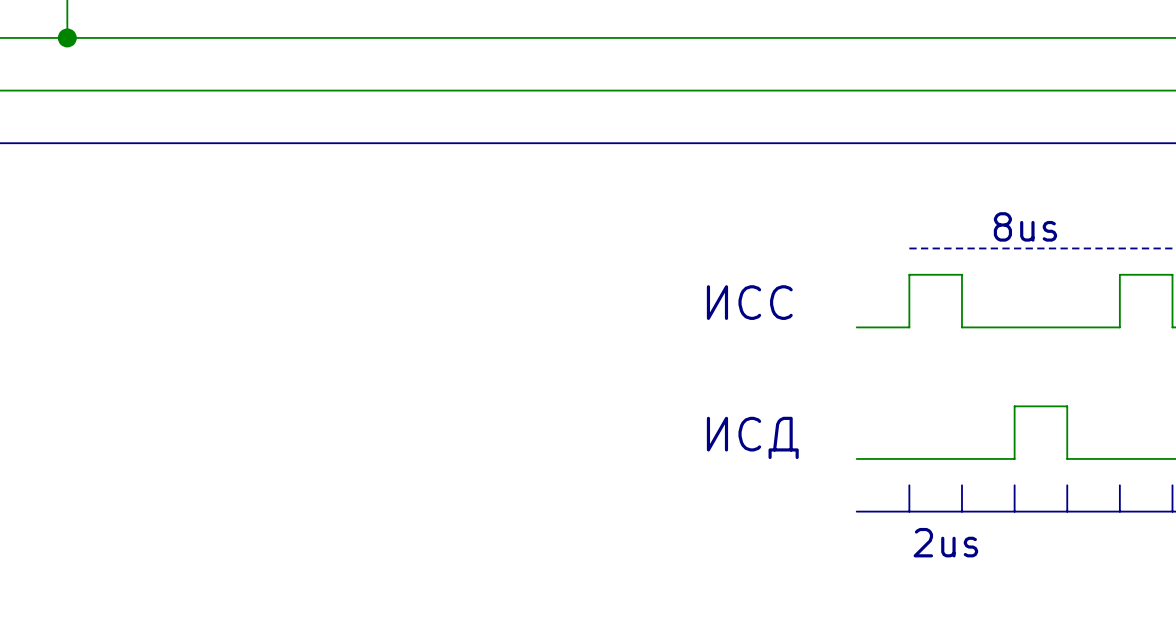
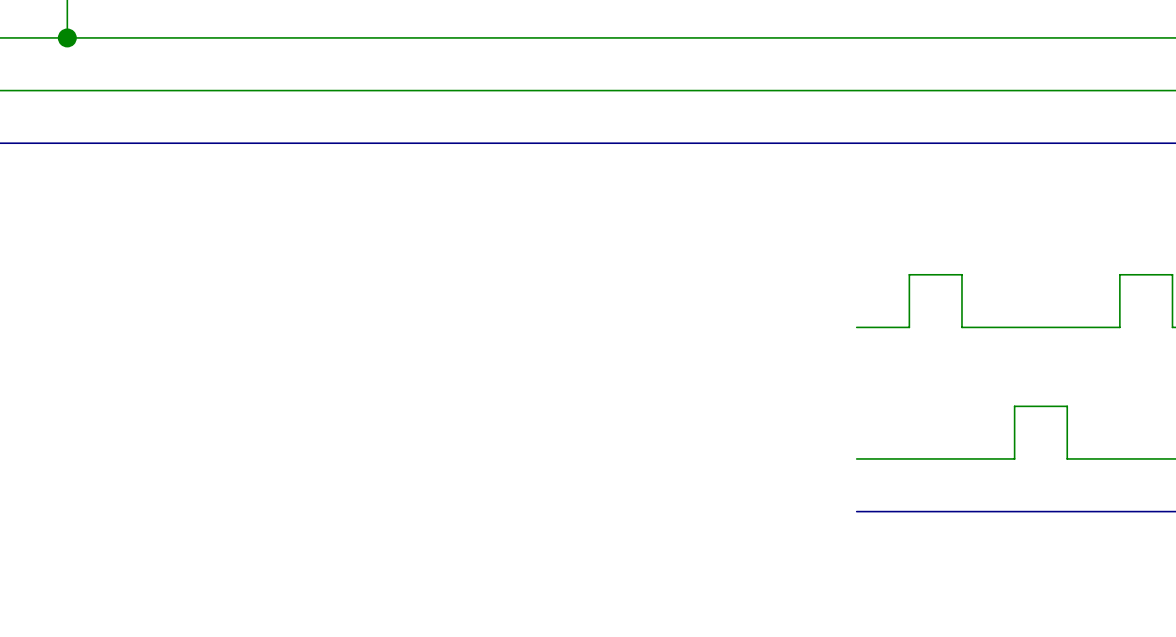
text: 8us (1025, 226) -> none
line: (909, 248) (1172, 248) -> none
text: ИСС (749, 302) -> none
text: ИСД (752, 437) -> none
bus: (909, 485) (909, 511) -> none
bus: (961, 485) (961, 511) -> none
bus: (1014, 485) (1014, 511) -> none
bus: (1067, 485) (1067, 511) -> none
bus: (1119, 485) (1119, 511) -> none
bus: (1172, 485) (1172, 511) -> none
text: 2us (945, 542) -> none

